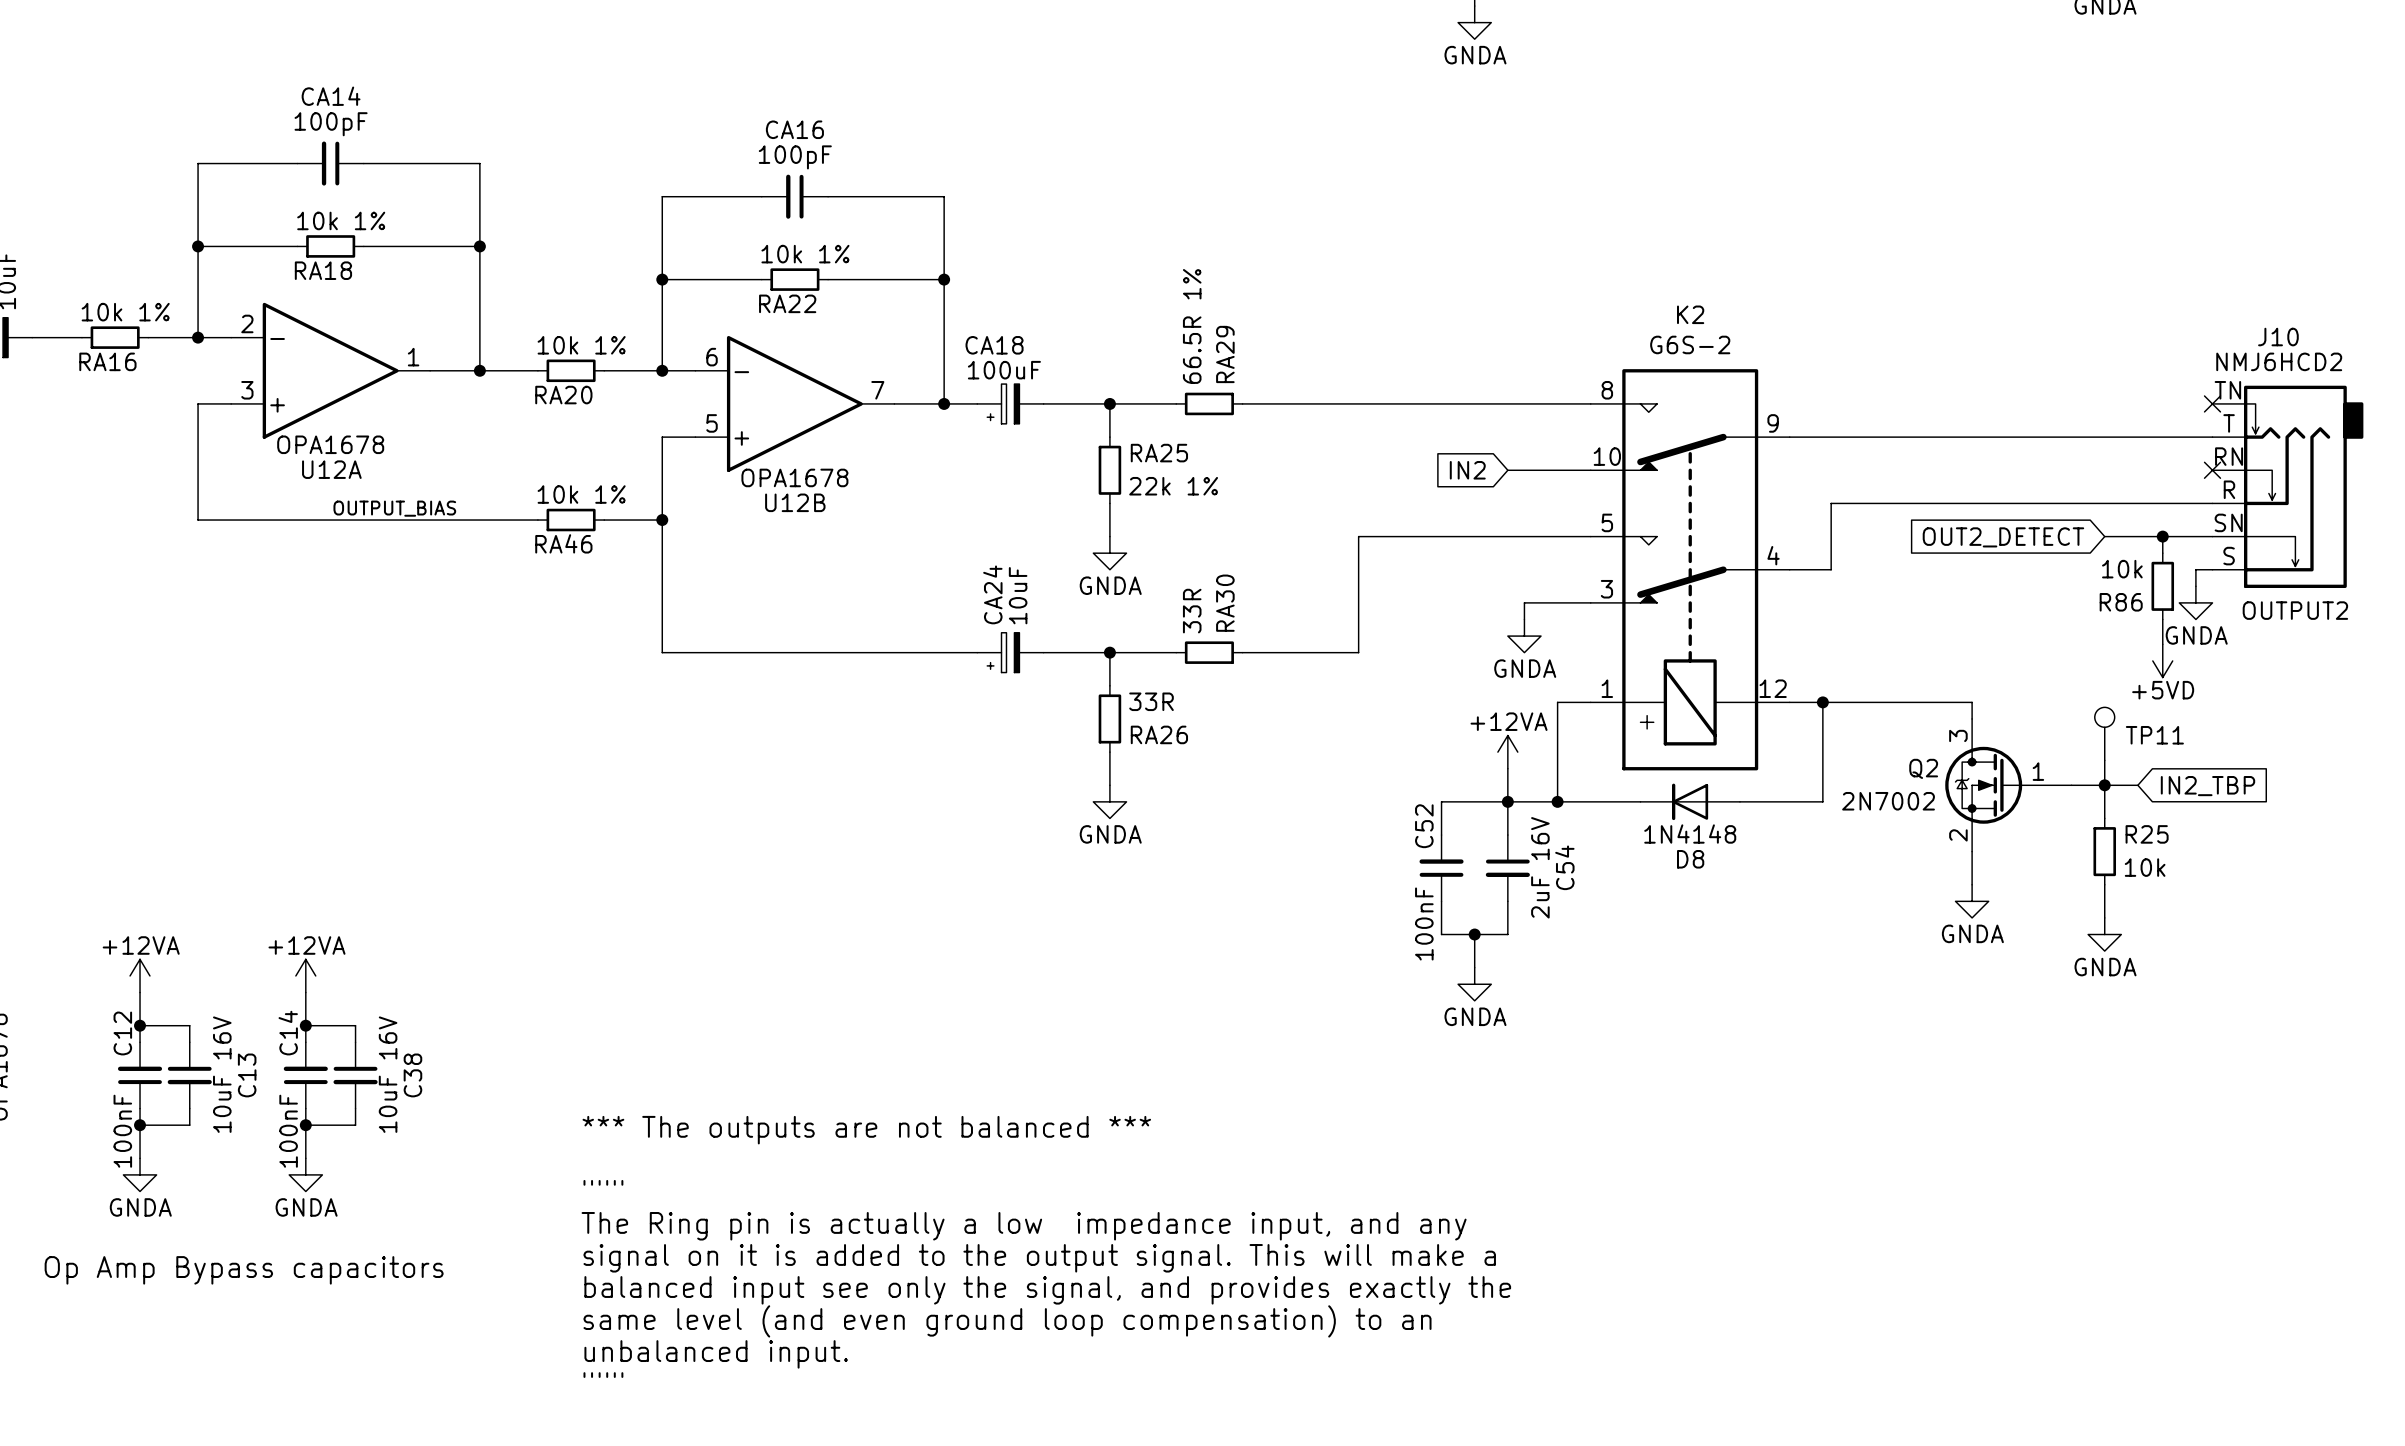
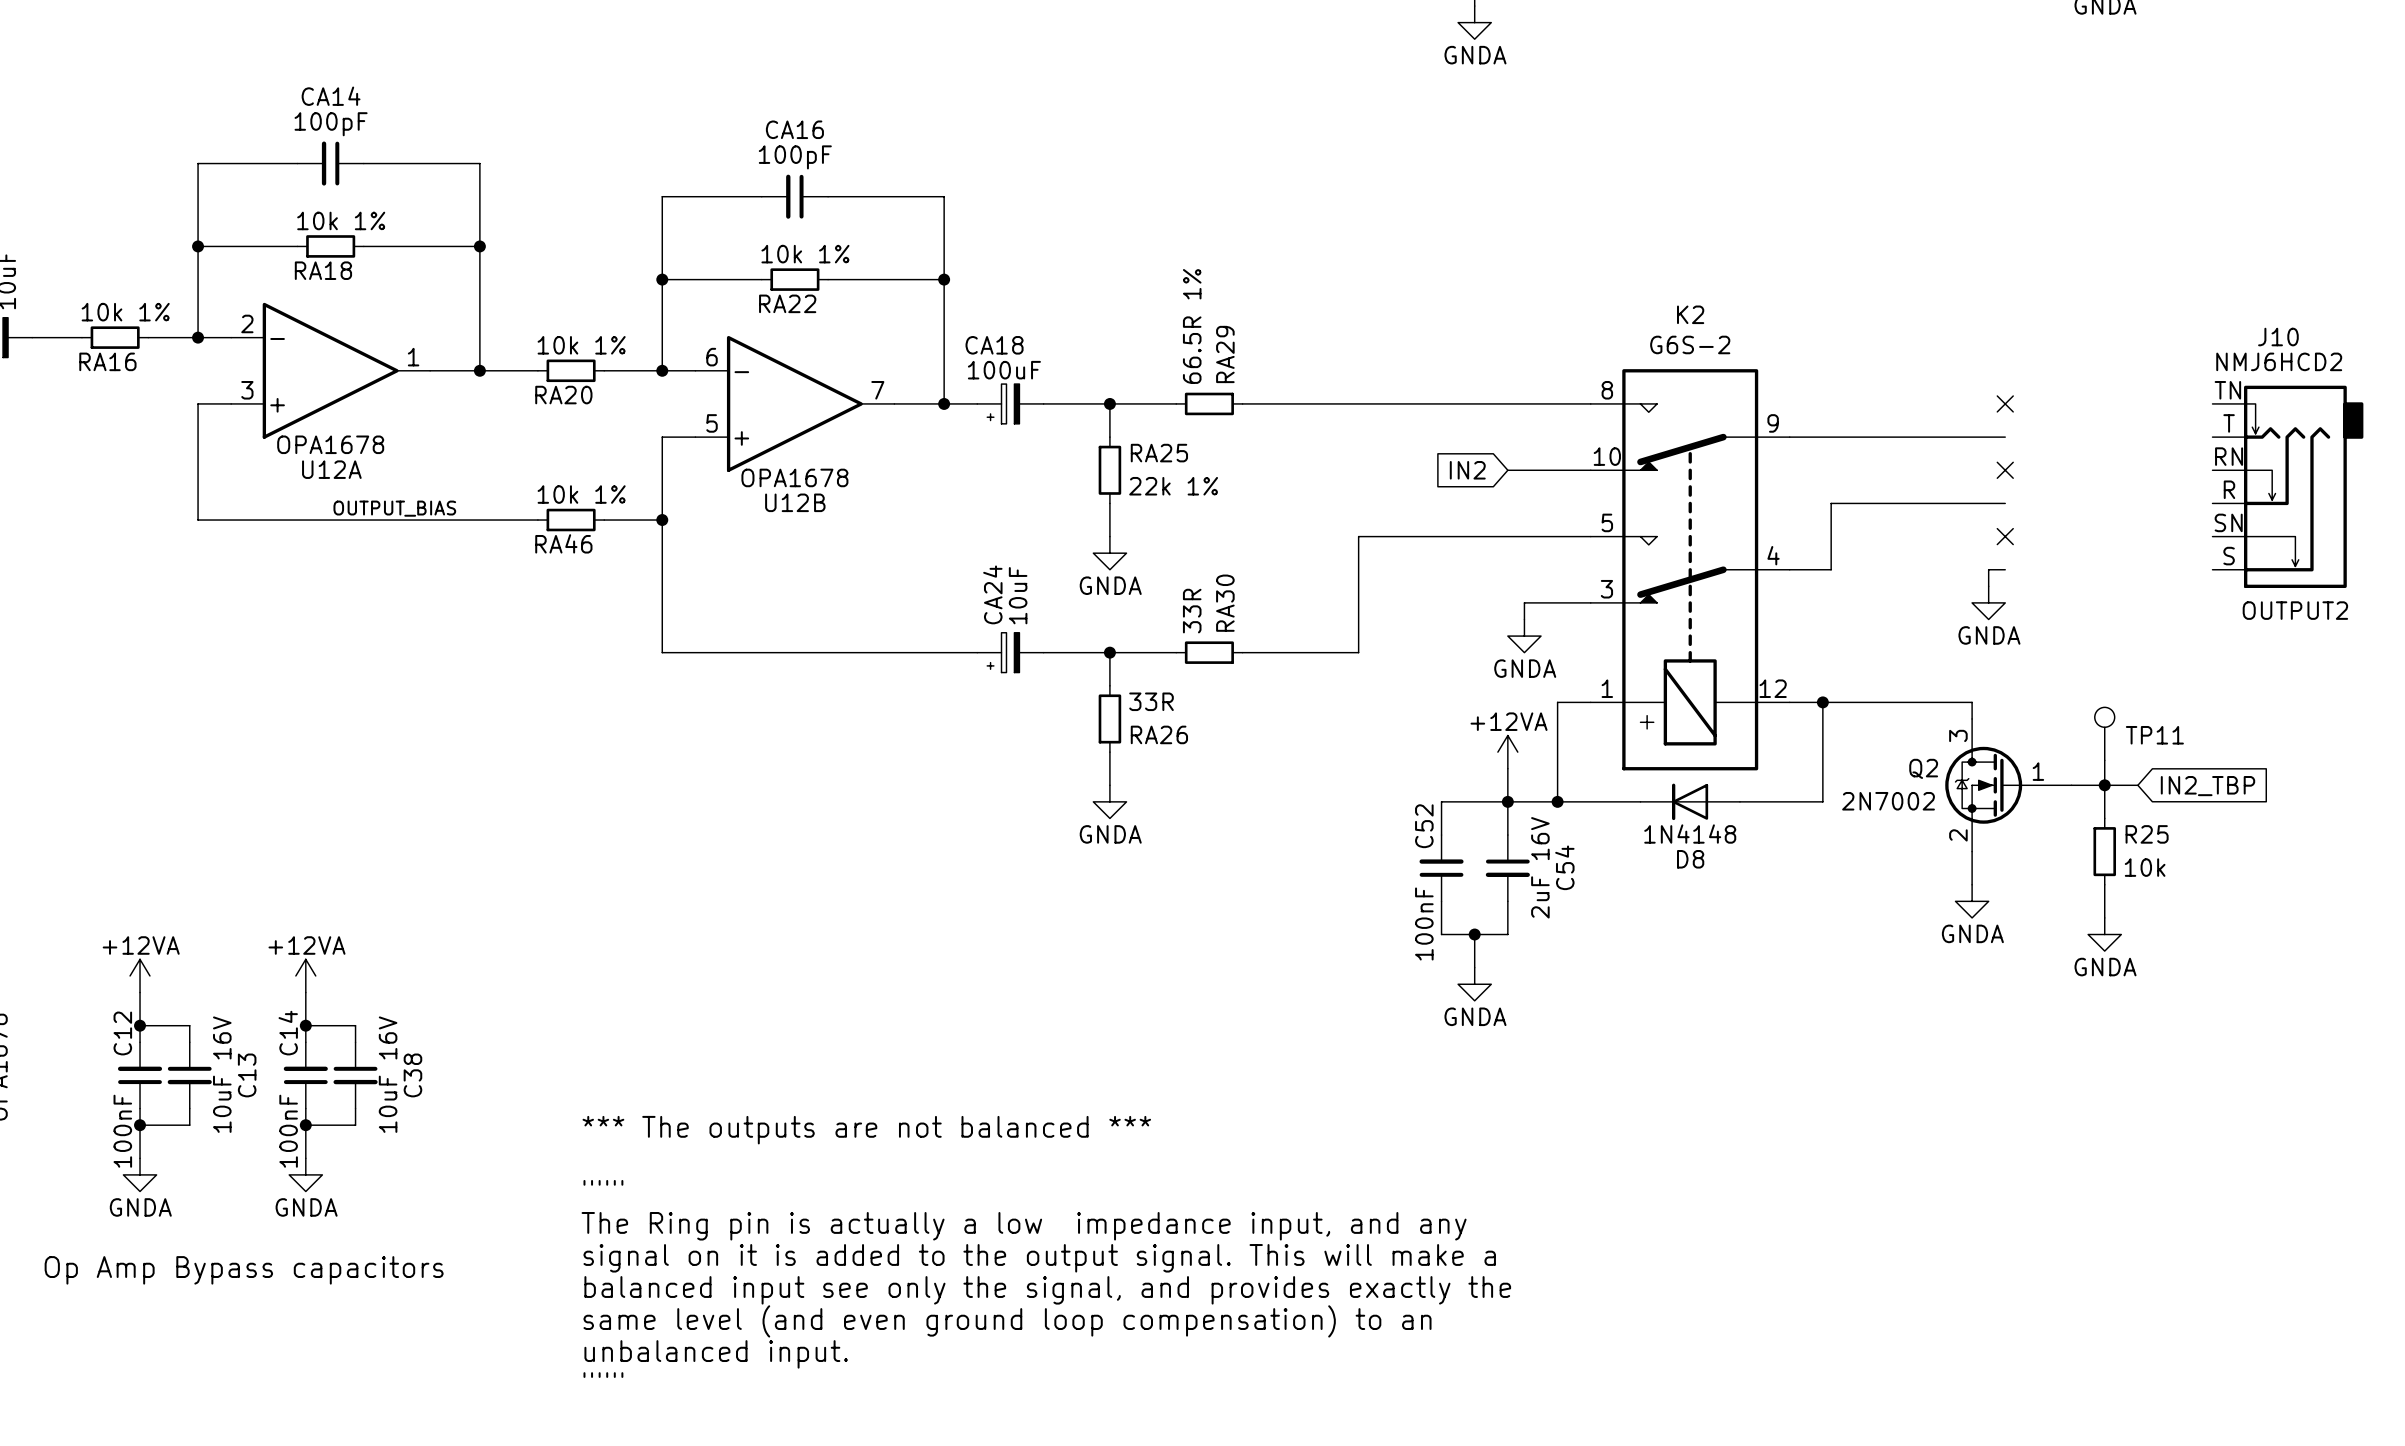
no-connect mark: none -> (2005, 403)
no-connect mark: (2212, 403) -> none
wire: (2005, 437) (2212, 437) -> none
no-connect mark: none -> (2005, 470)
no-connect mark: (2212, 470) -> none
wire: (2005, 503) (2212, 503) -> none
no-connect mark: none -> (2005, 536)
wire: (2104, 536) (2212, 536) -> none
wire: (2162, 536) (2162, 553) -> none
junction: (2162, 536) -> none
global label: OUT2_DETECT (2003, 537) -> none
wire: (2212, 569) (2195, 569) (2195, 586) -> (2005, 569) (1988, 569) (1988, 586)
R86: 10k (2162, 586) -> none
power symbol position: GNDA (2195, 602) -> GNDA (1988, 602)
wire: (2162, 619) (2162, 644) -> none
power symbol: +5VD (2162, 660) -> none

